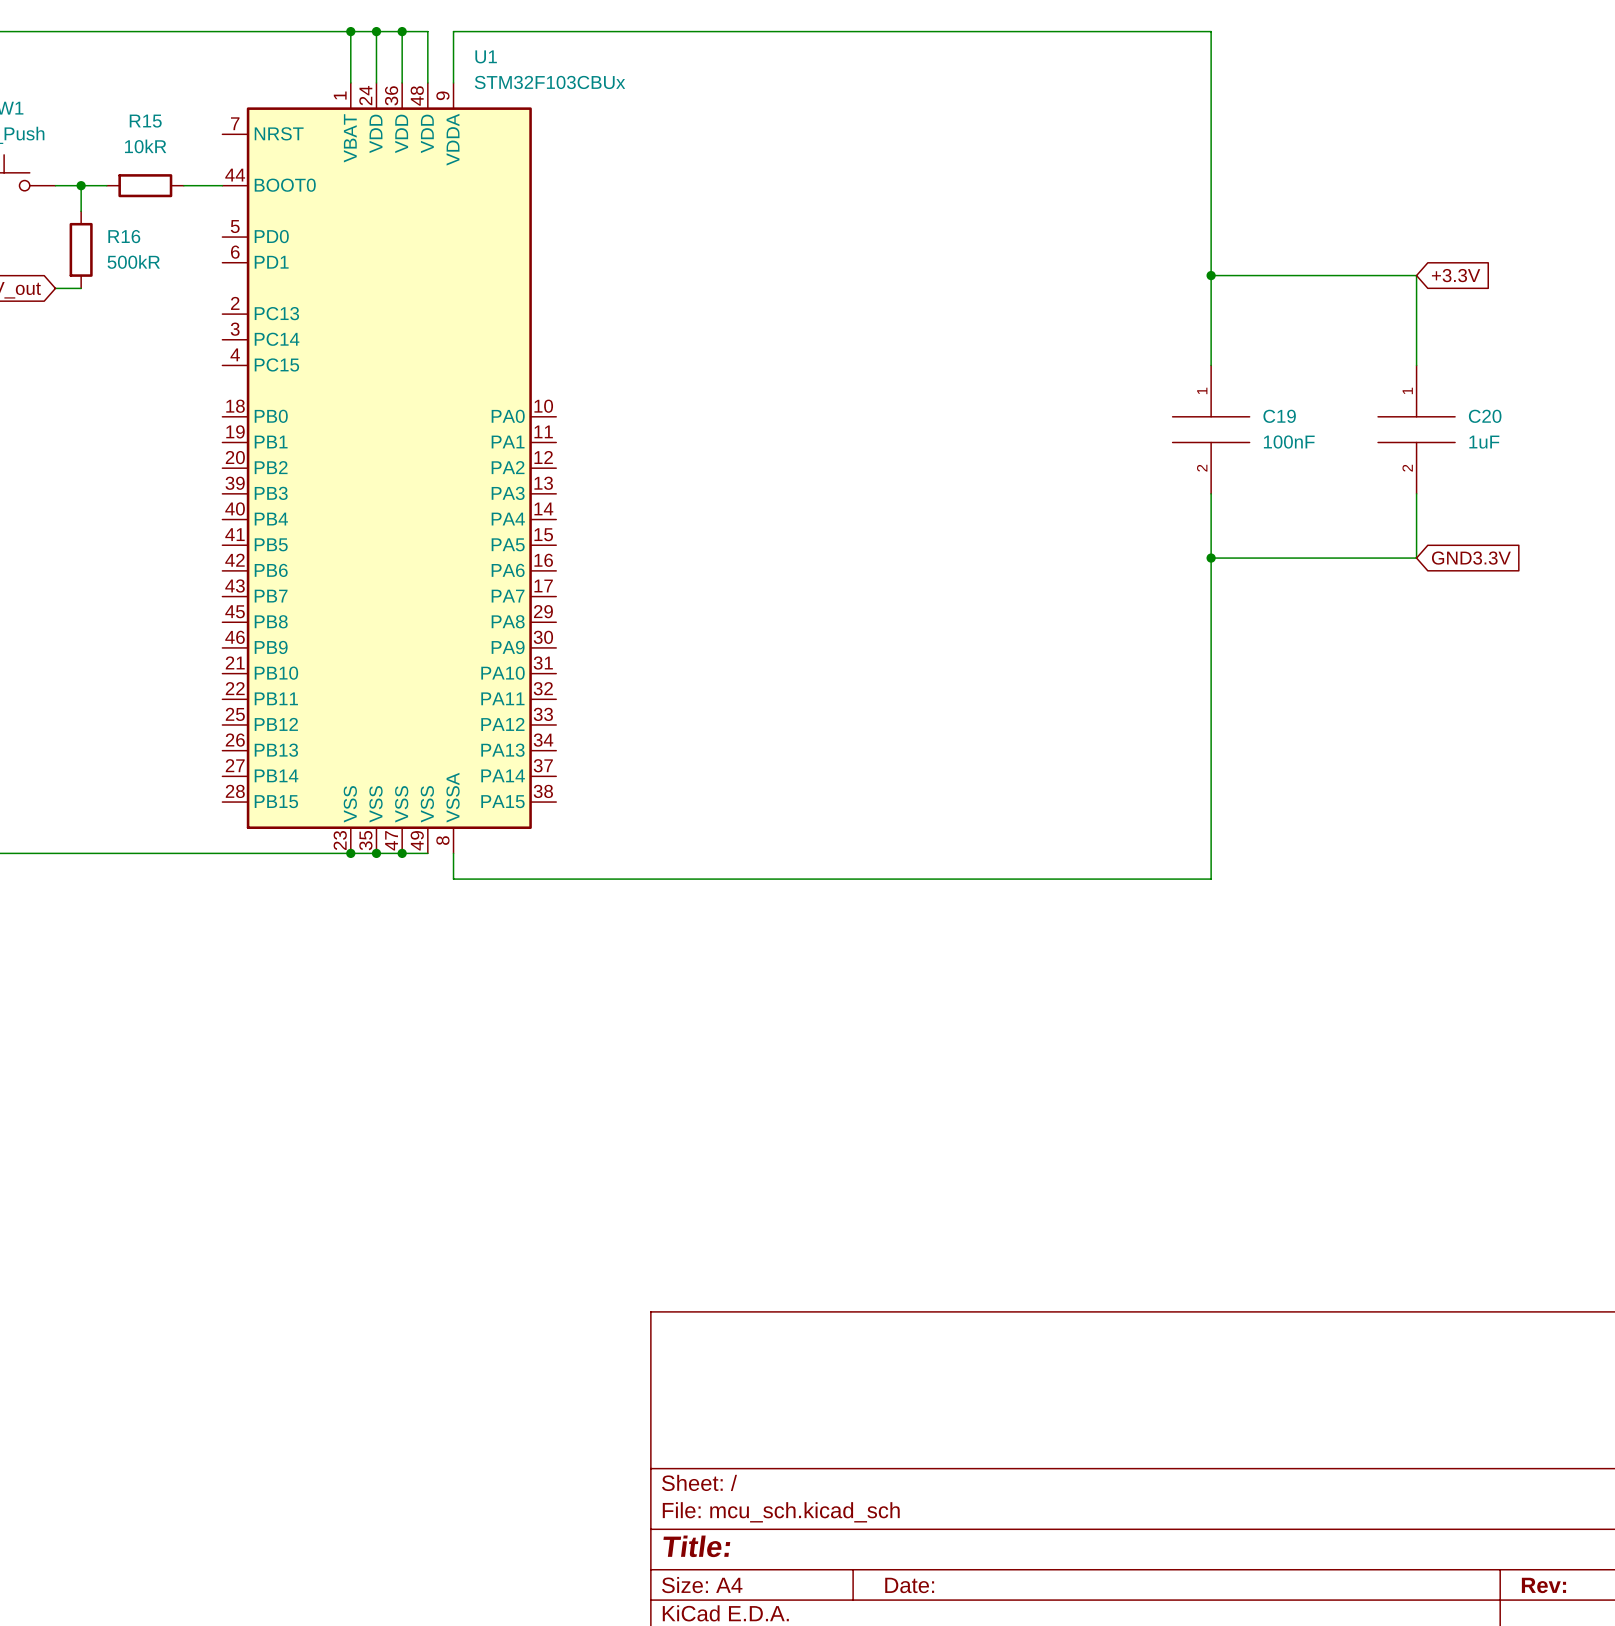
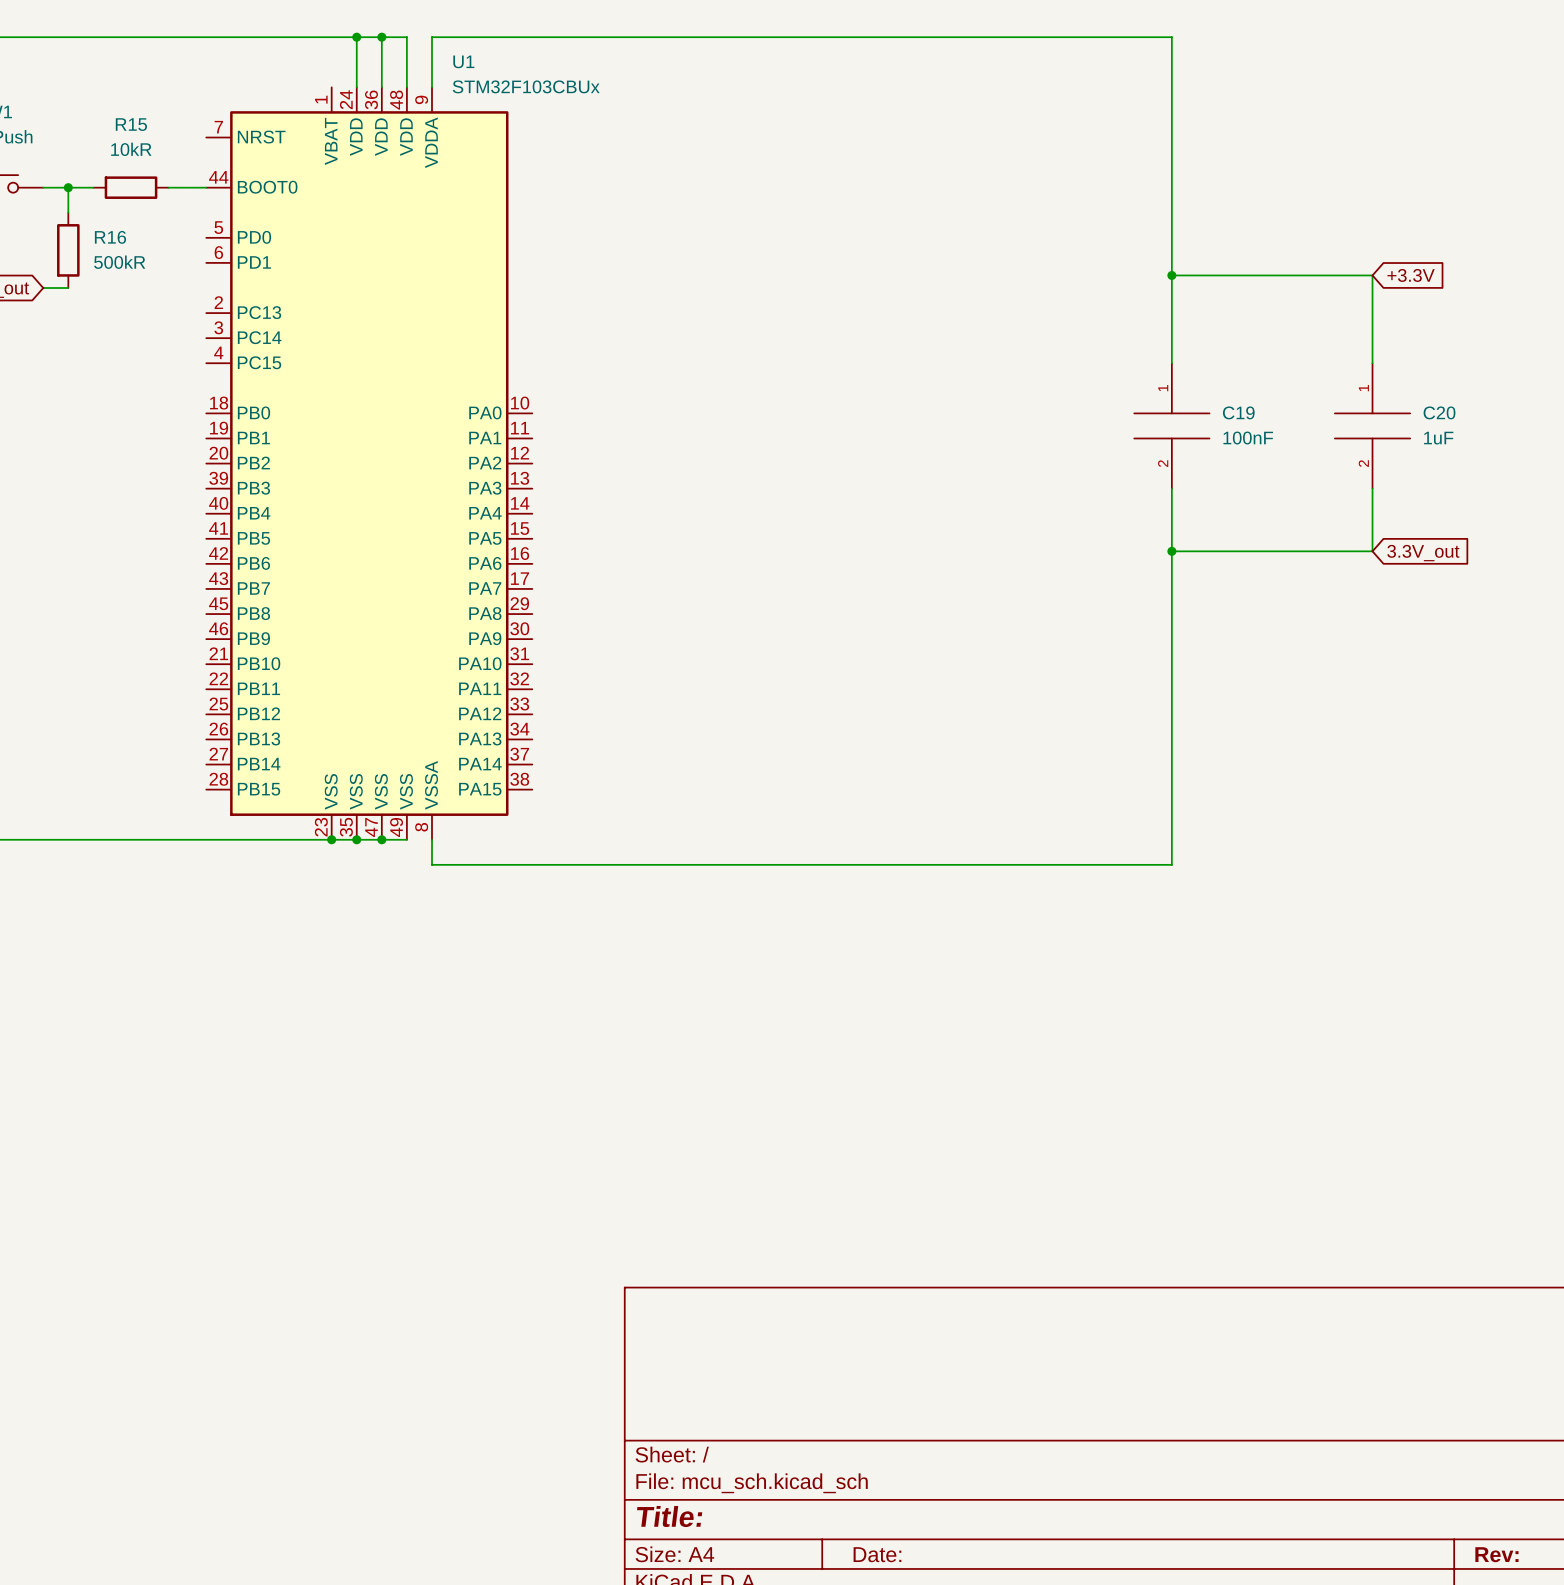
wire: (350, 31) (350, 82) -> none
junction: (350, 31) -> none
global label: GND3.3V (1471, 558) -> 3.3V_out (1423, 553)

